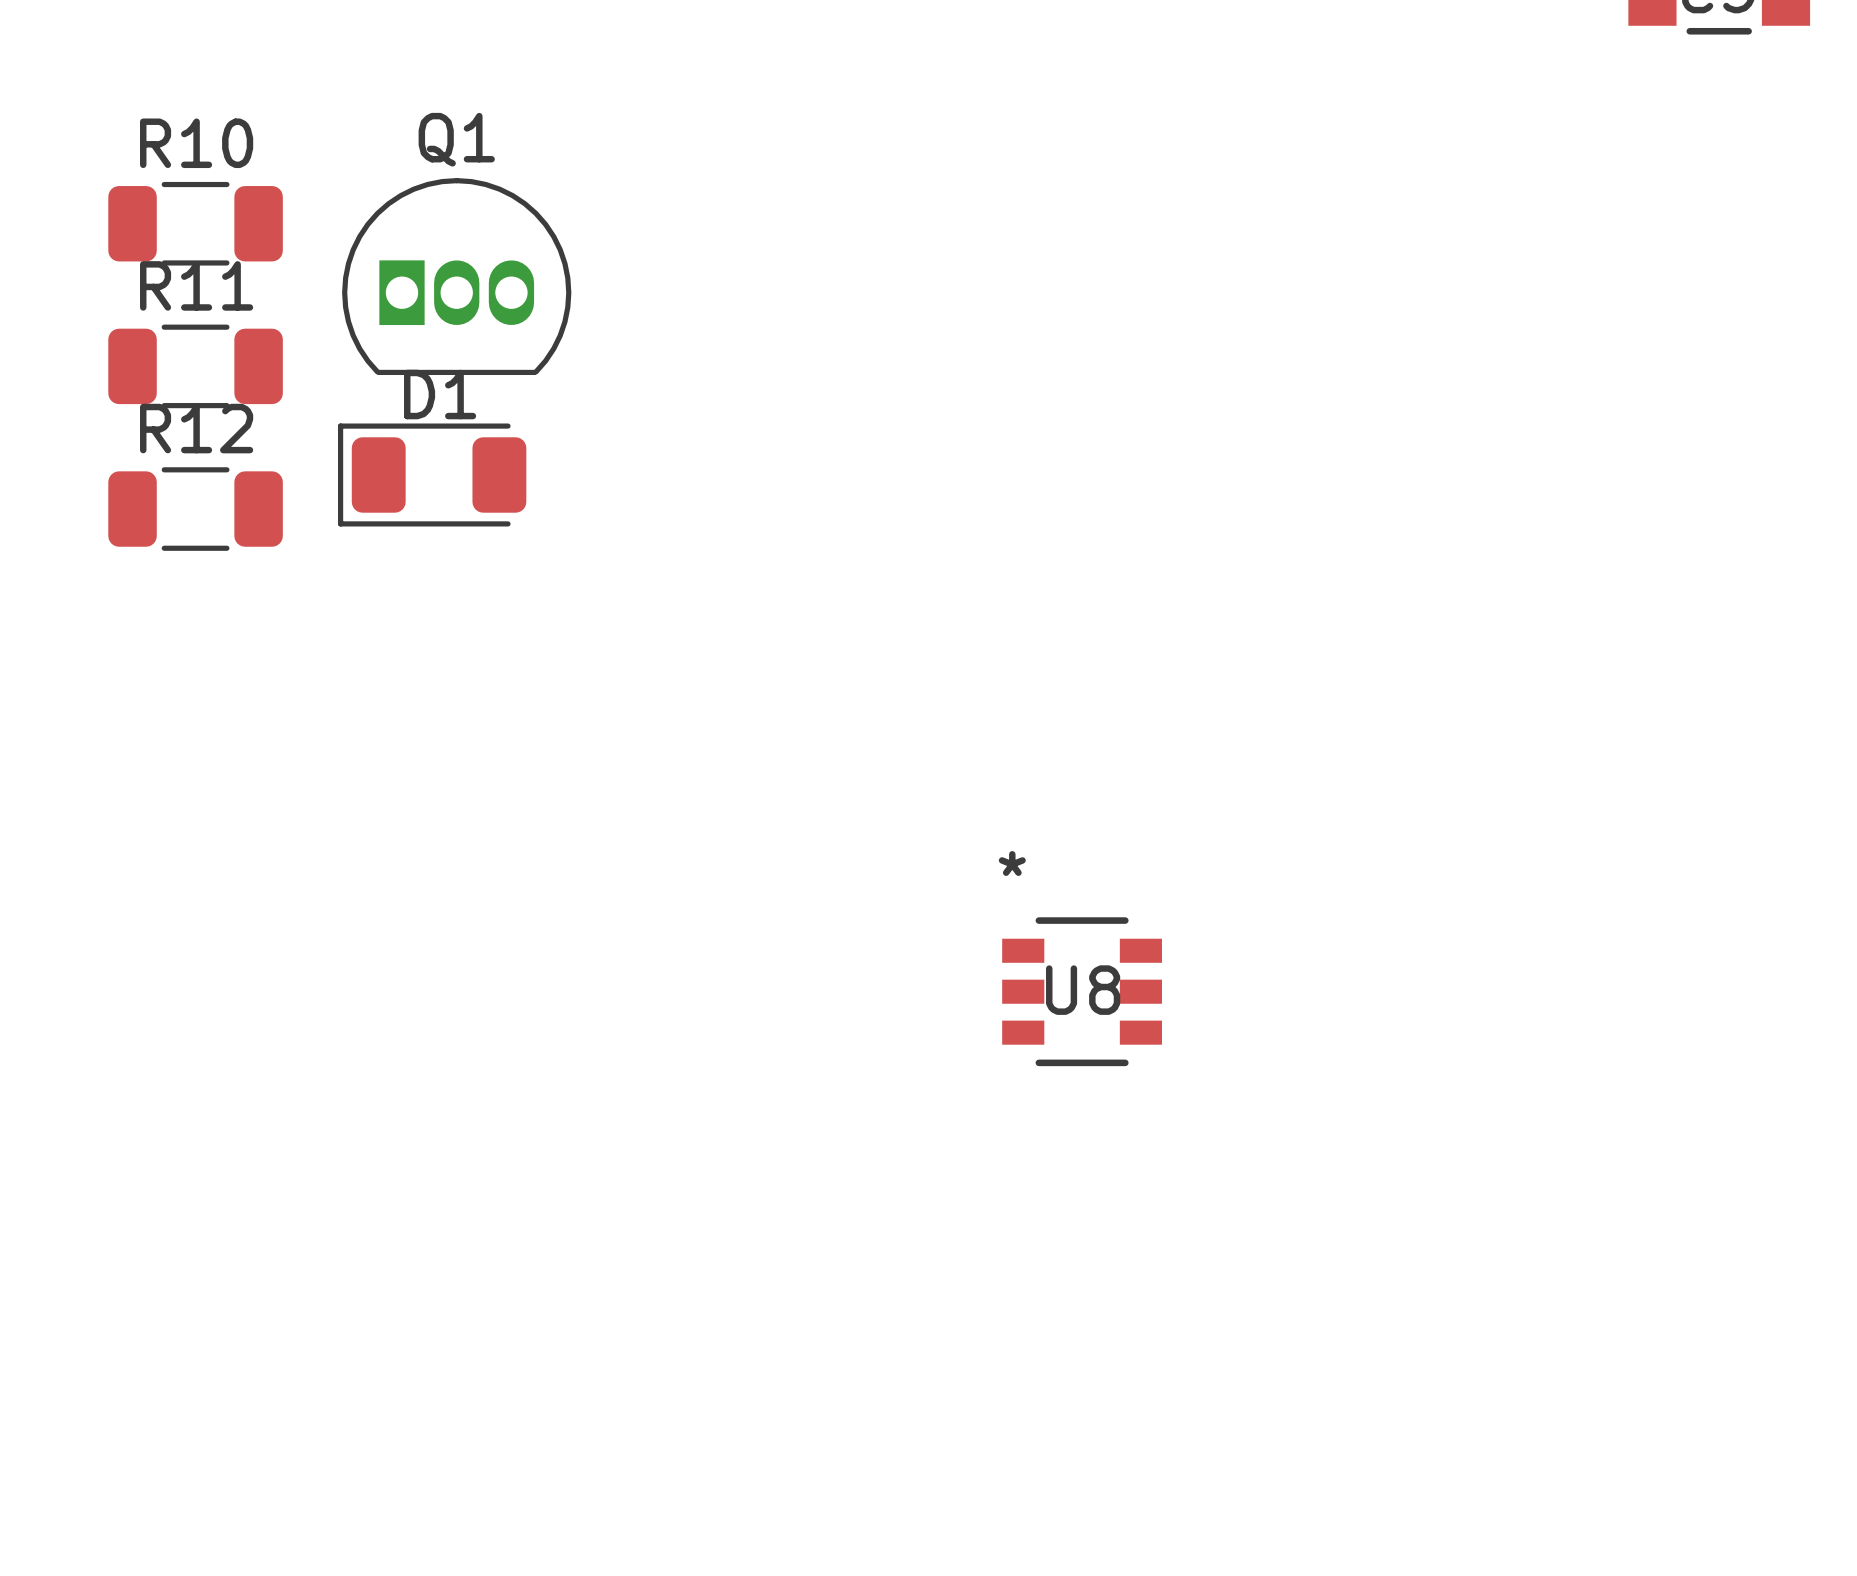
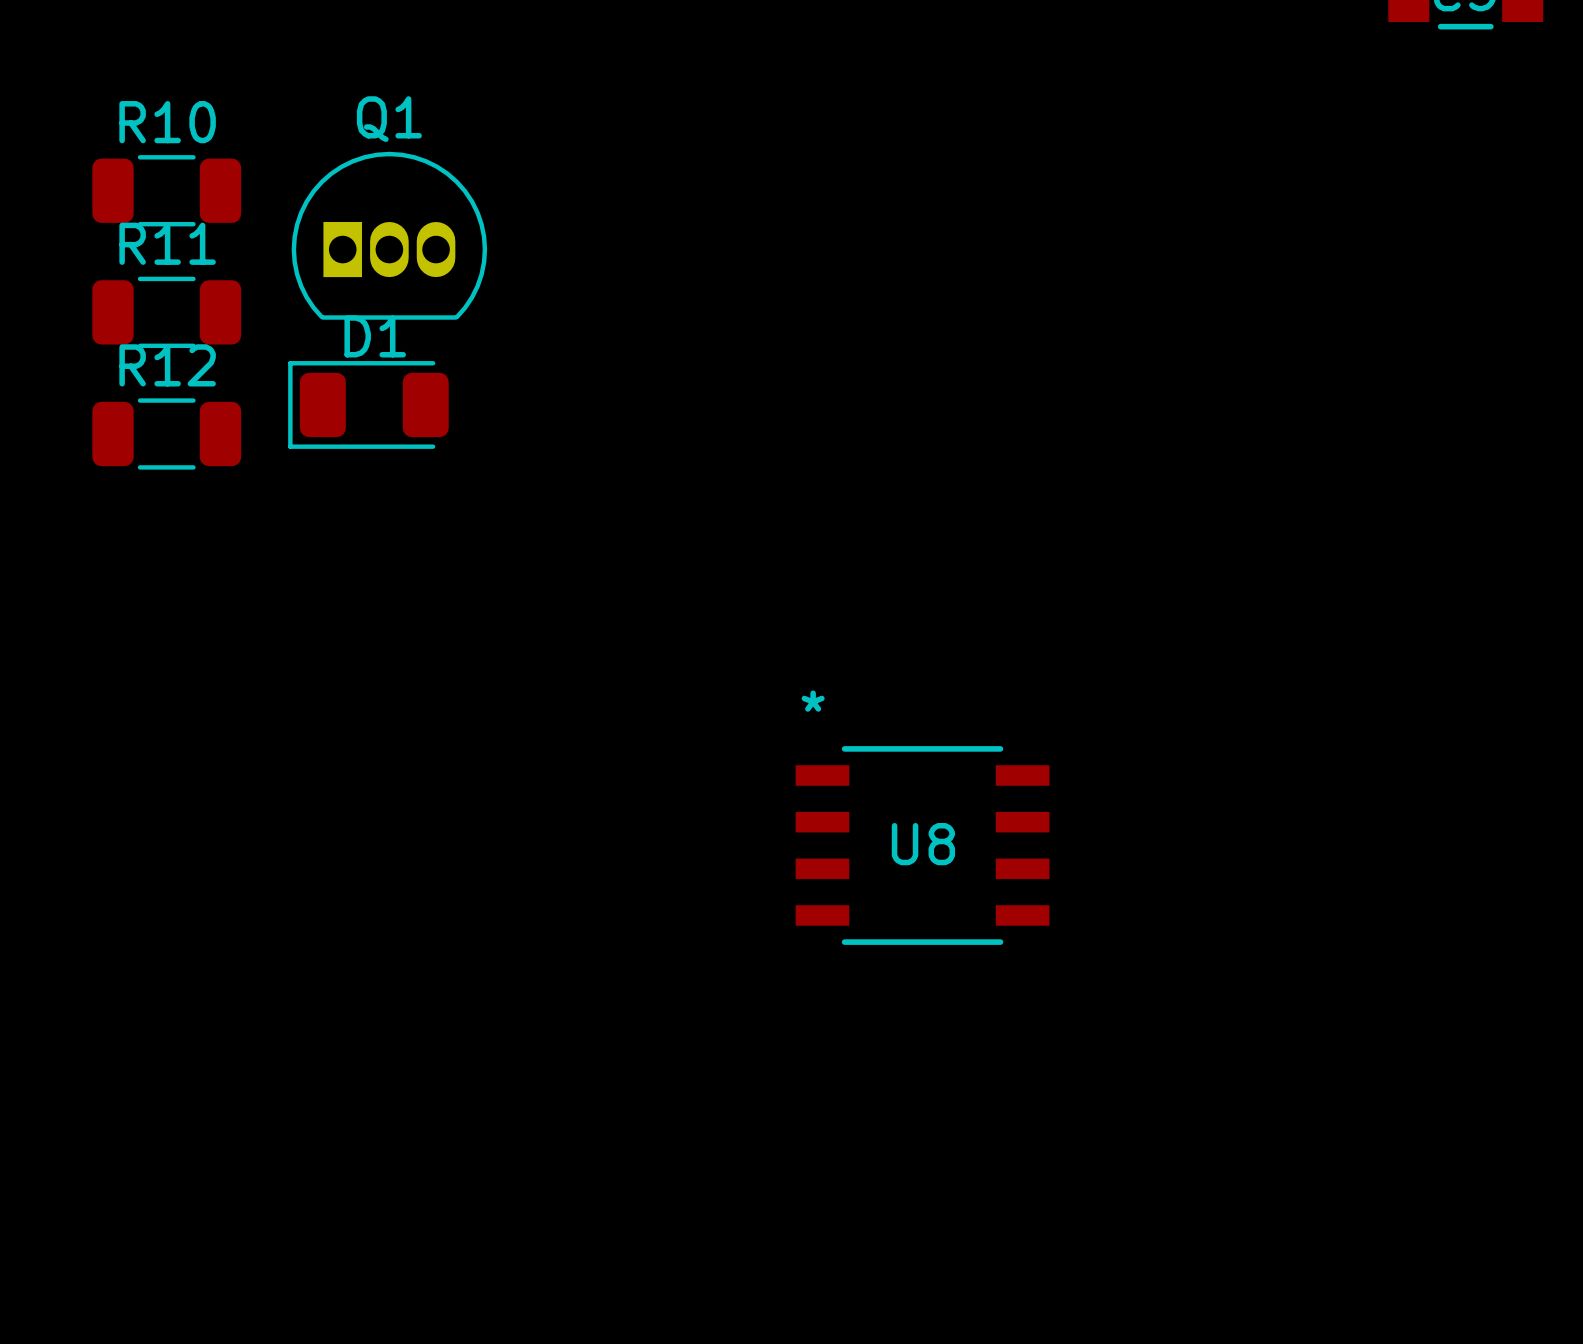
U8 footprint: [1002, 917, 1162, 1067] -> [795, 746, 1050, 945]

